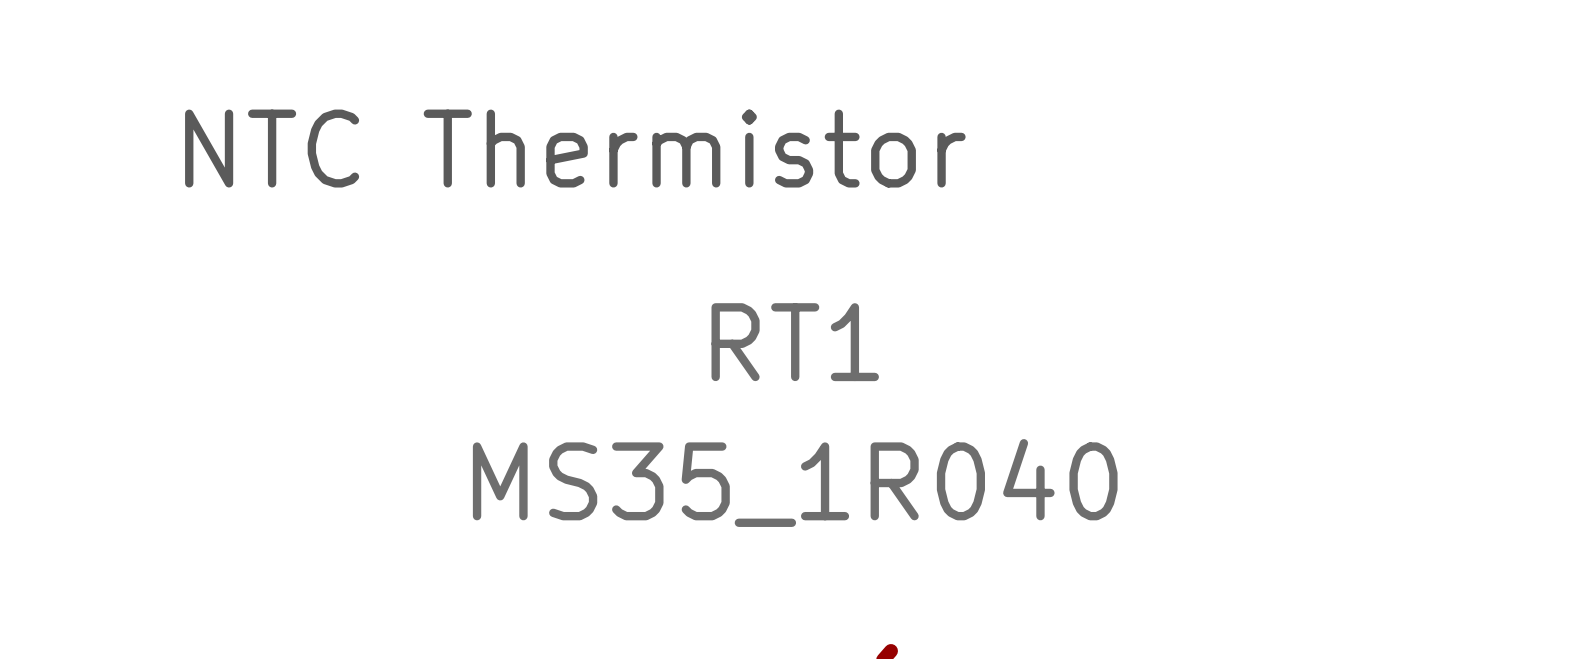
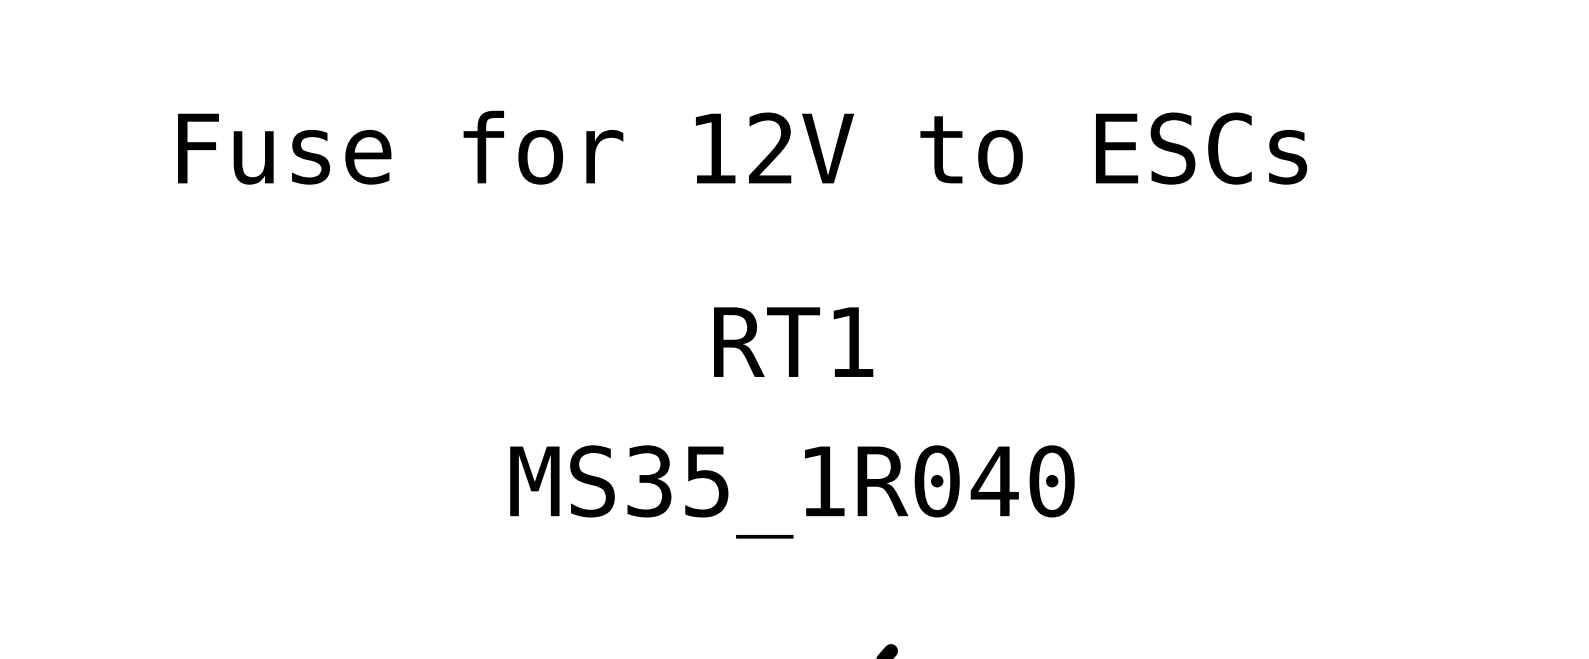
text: NTC Thermistor (575, 148) -> Fuse for 12V to ESCs (742, 147)

